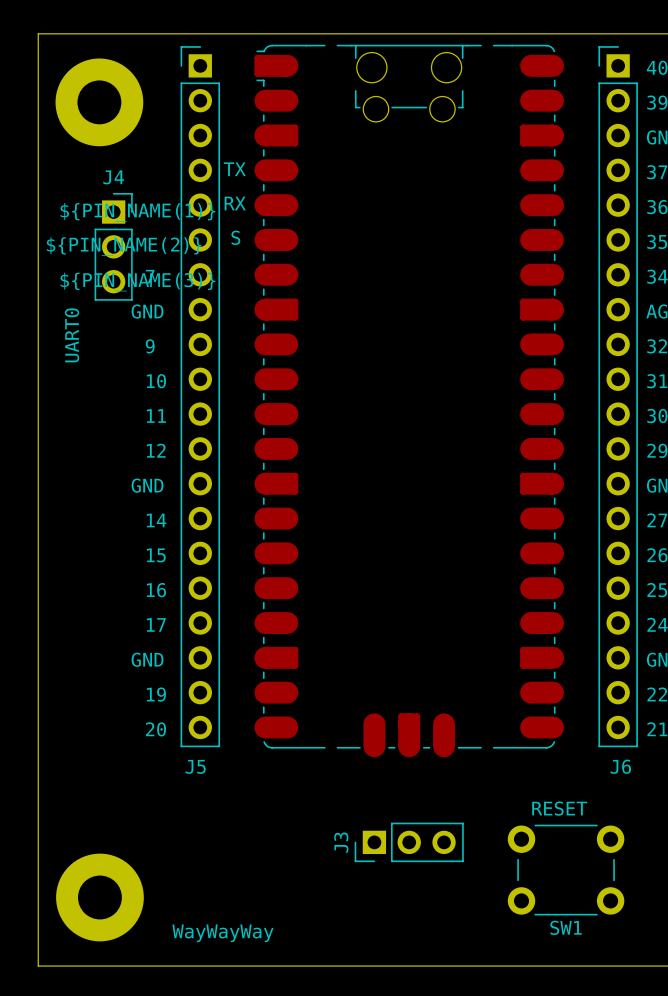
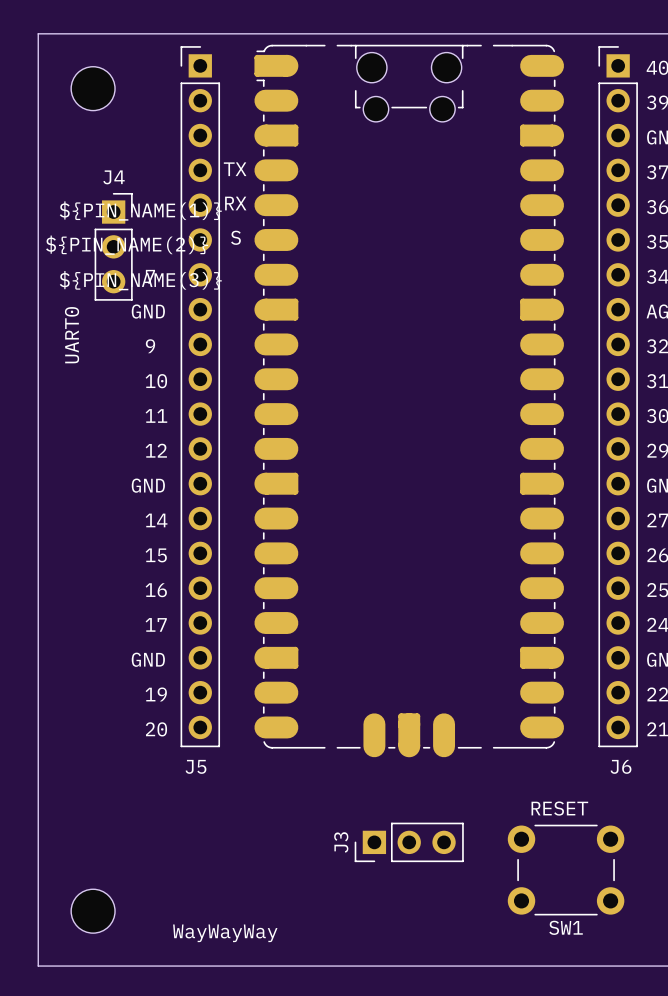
part: none -> (93, 88)
part: (99, 102) -> none
part: (99, 897) -> none
part: none -> (93, 911)

